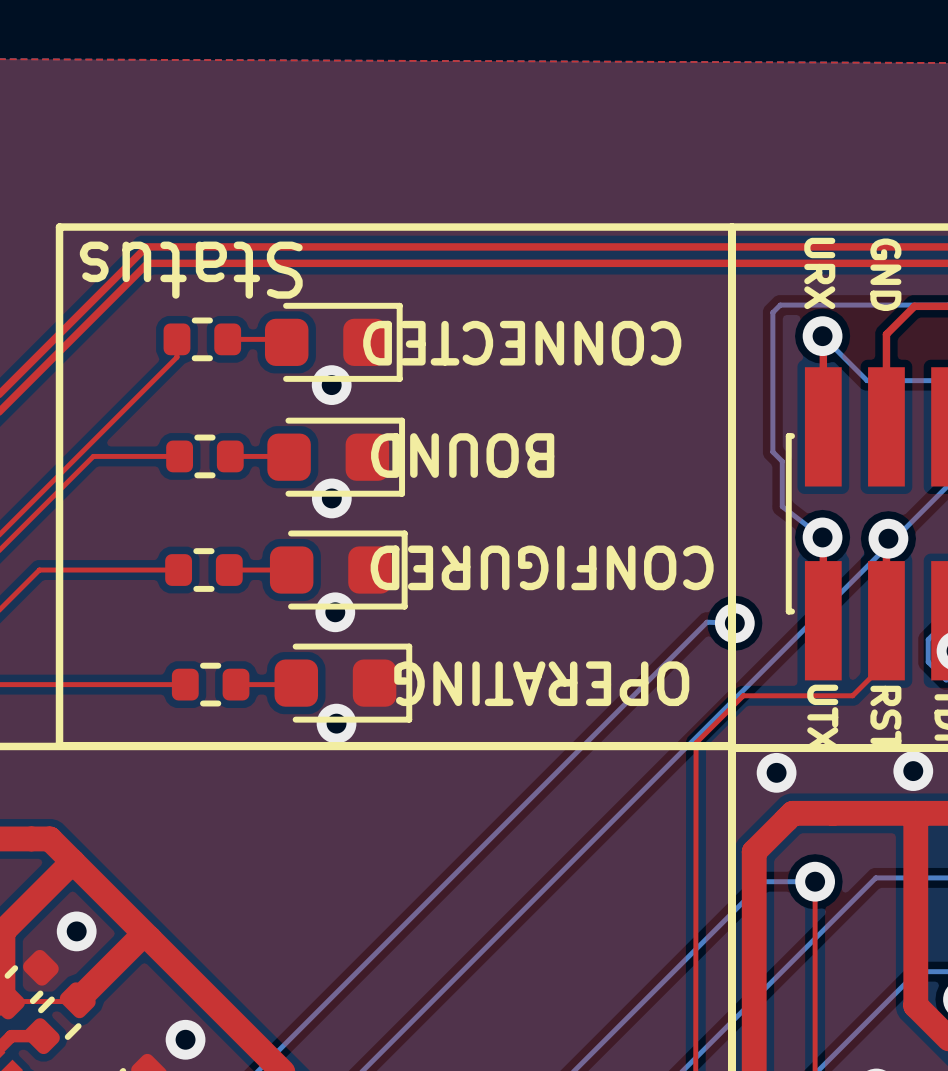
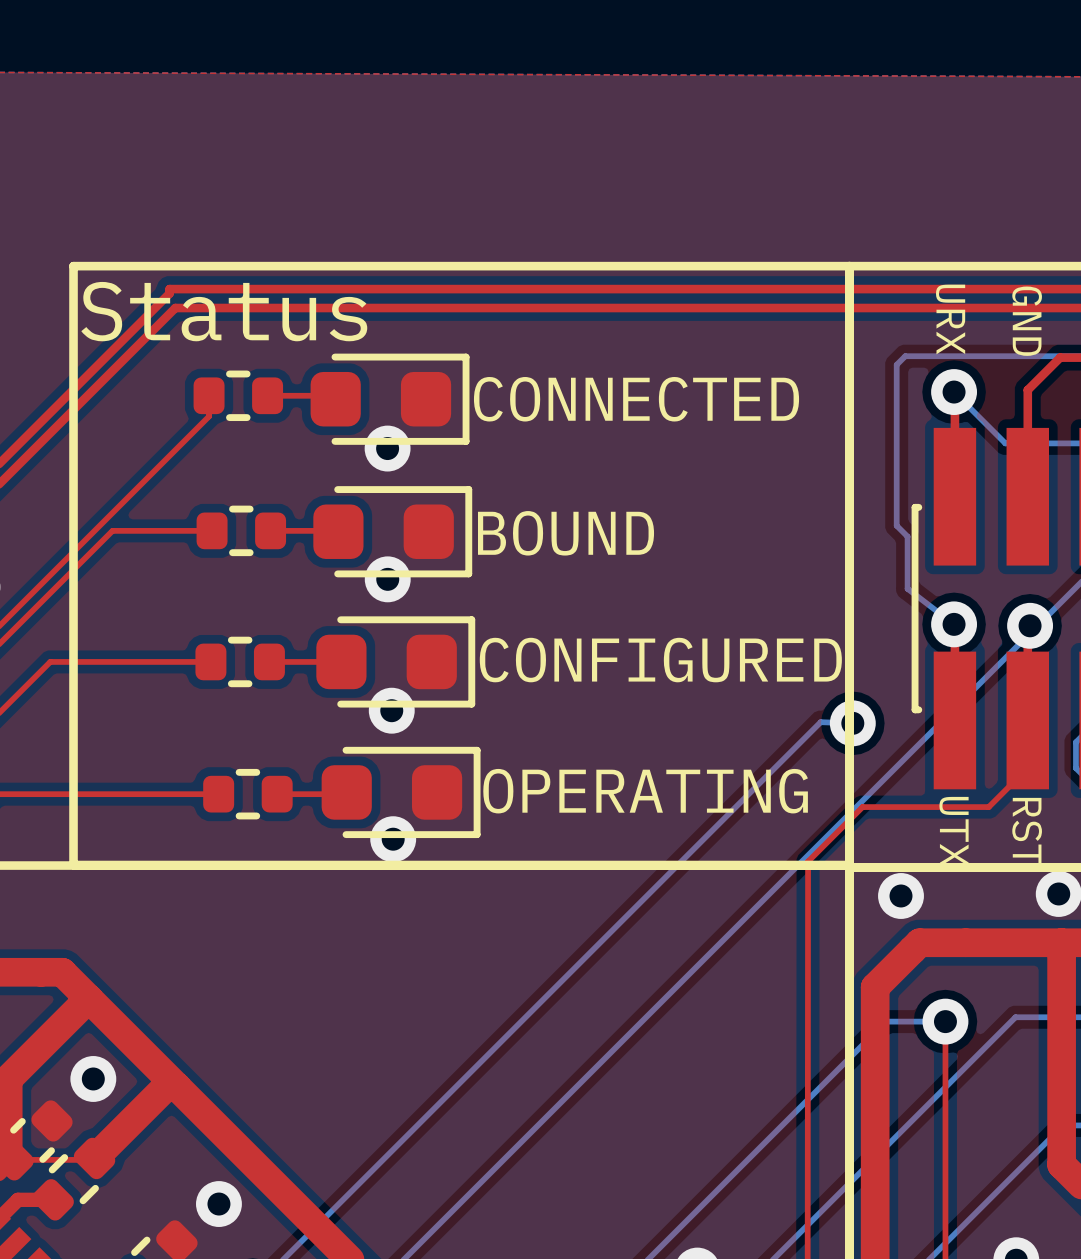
text rotation: 0° (191, 270) -> 180° (224, 311)
text rotation: 0° (522, 343) -> 180° (636, 399)
text rotation: 0° (462, 455) -> 180° (566, 533)
text rotation: 0° (542, 567) -> 180° (660, 660)
text rotation: 0° (541, 683) -> 180° (645, 791)

